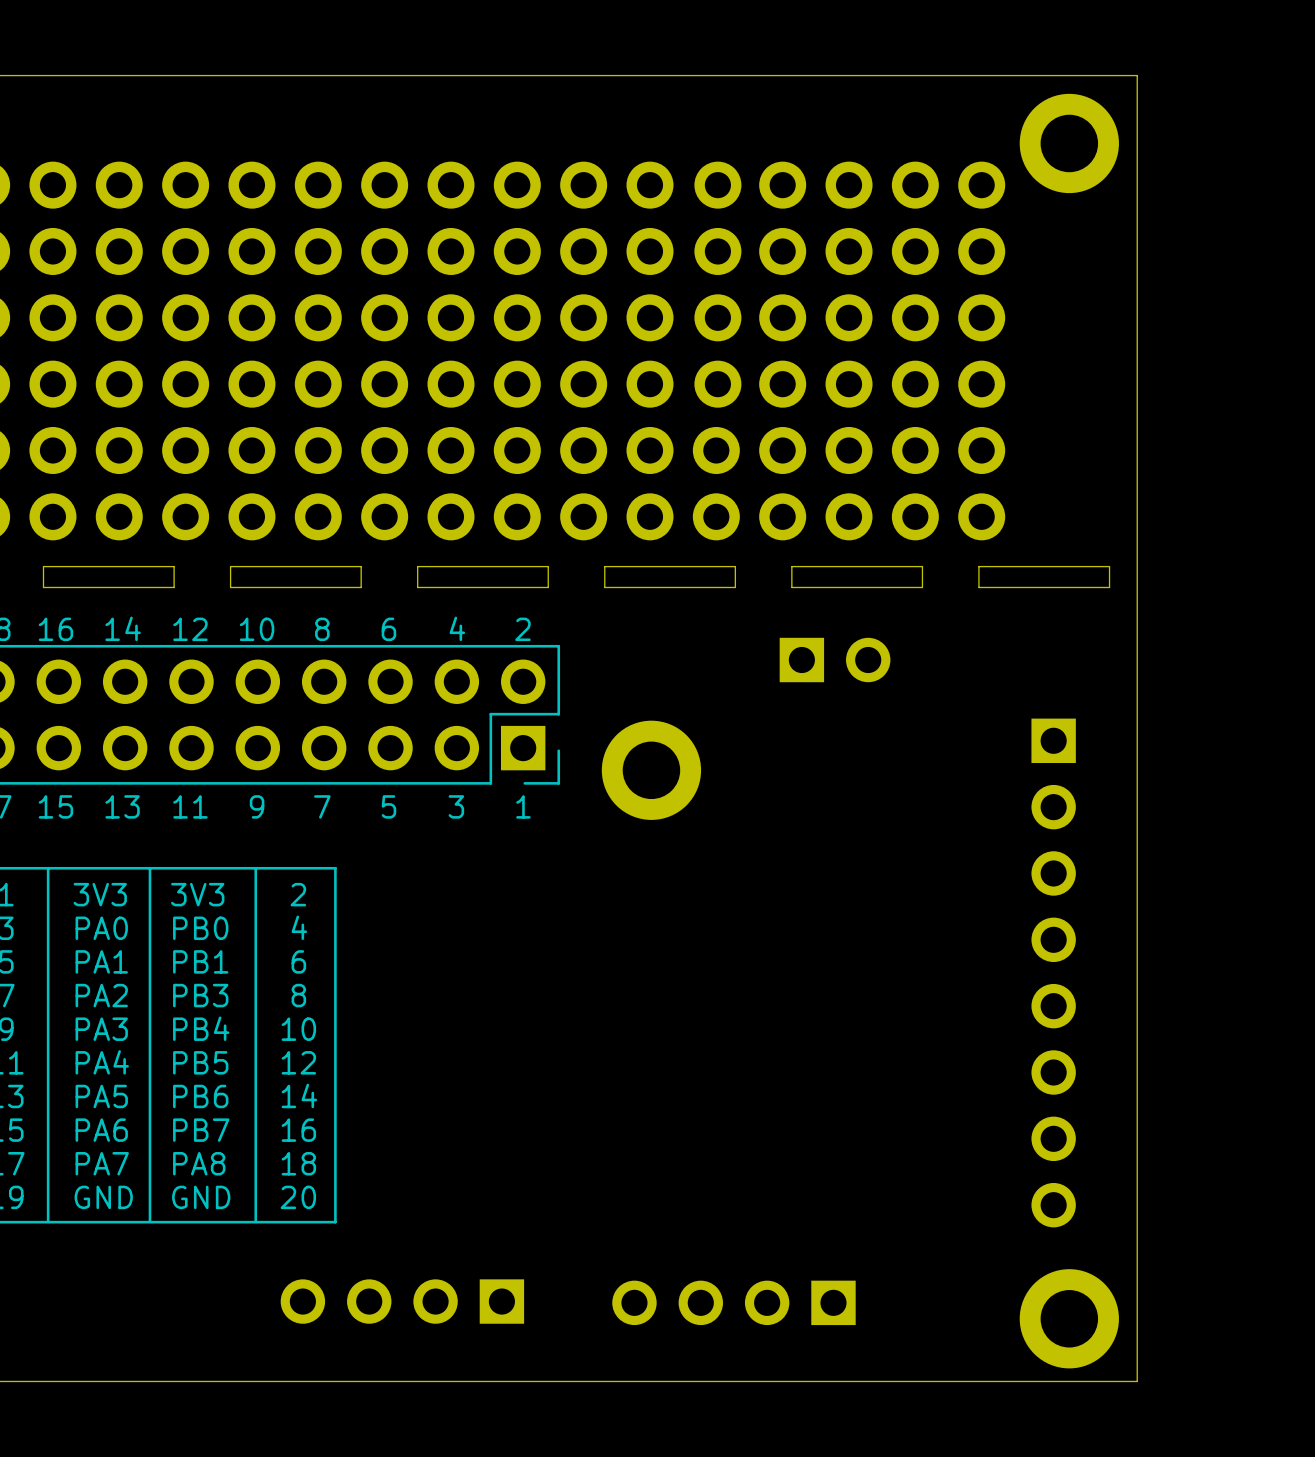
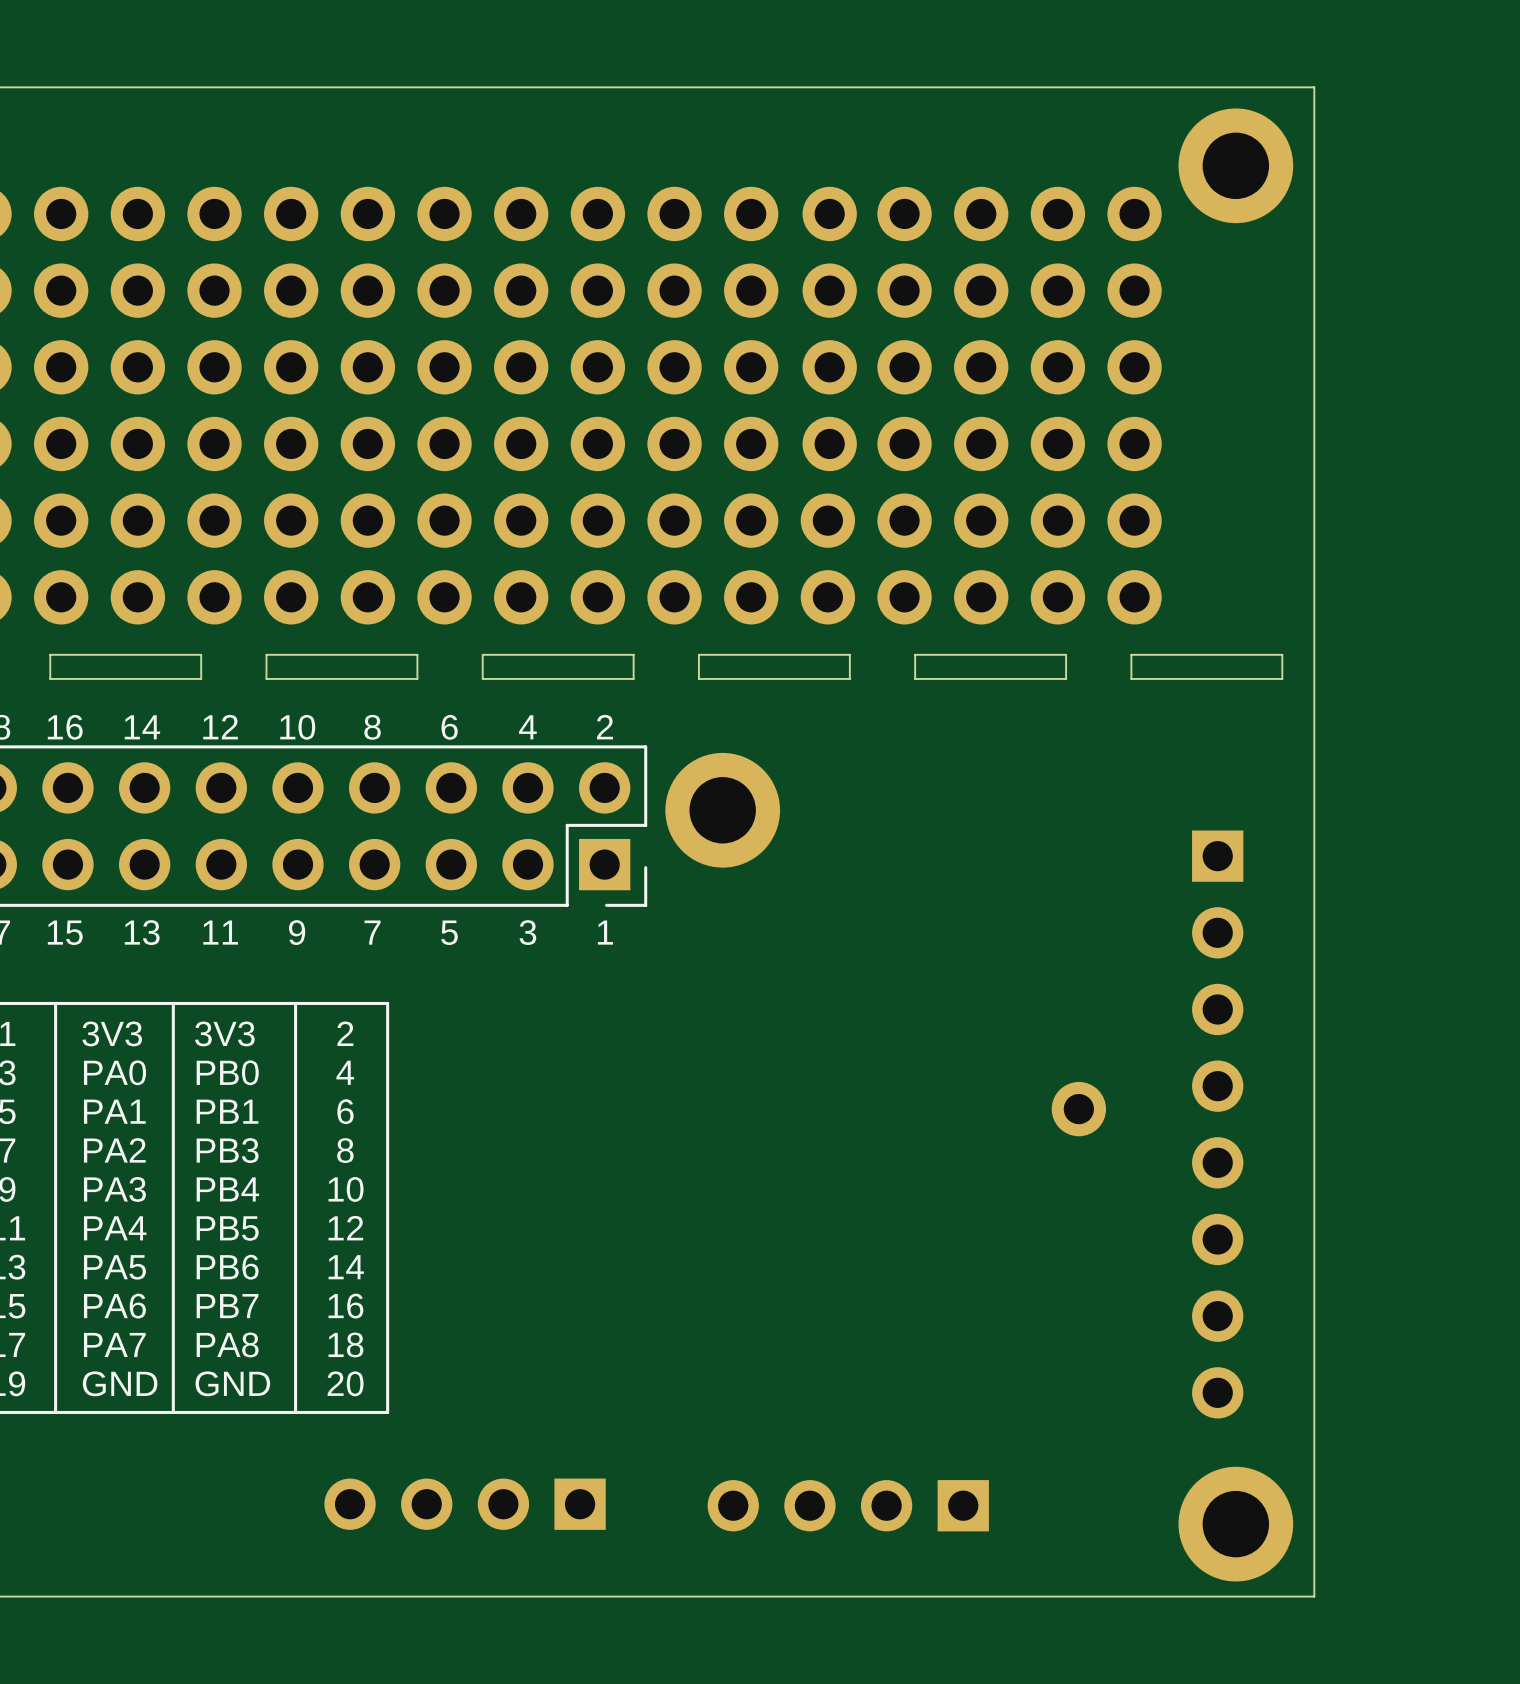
part: (835, 660) -> none
part position: (651, 770) -> (722, 810)
part: none -> (1078, 1109)

